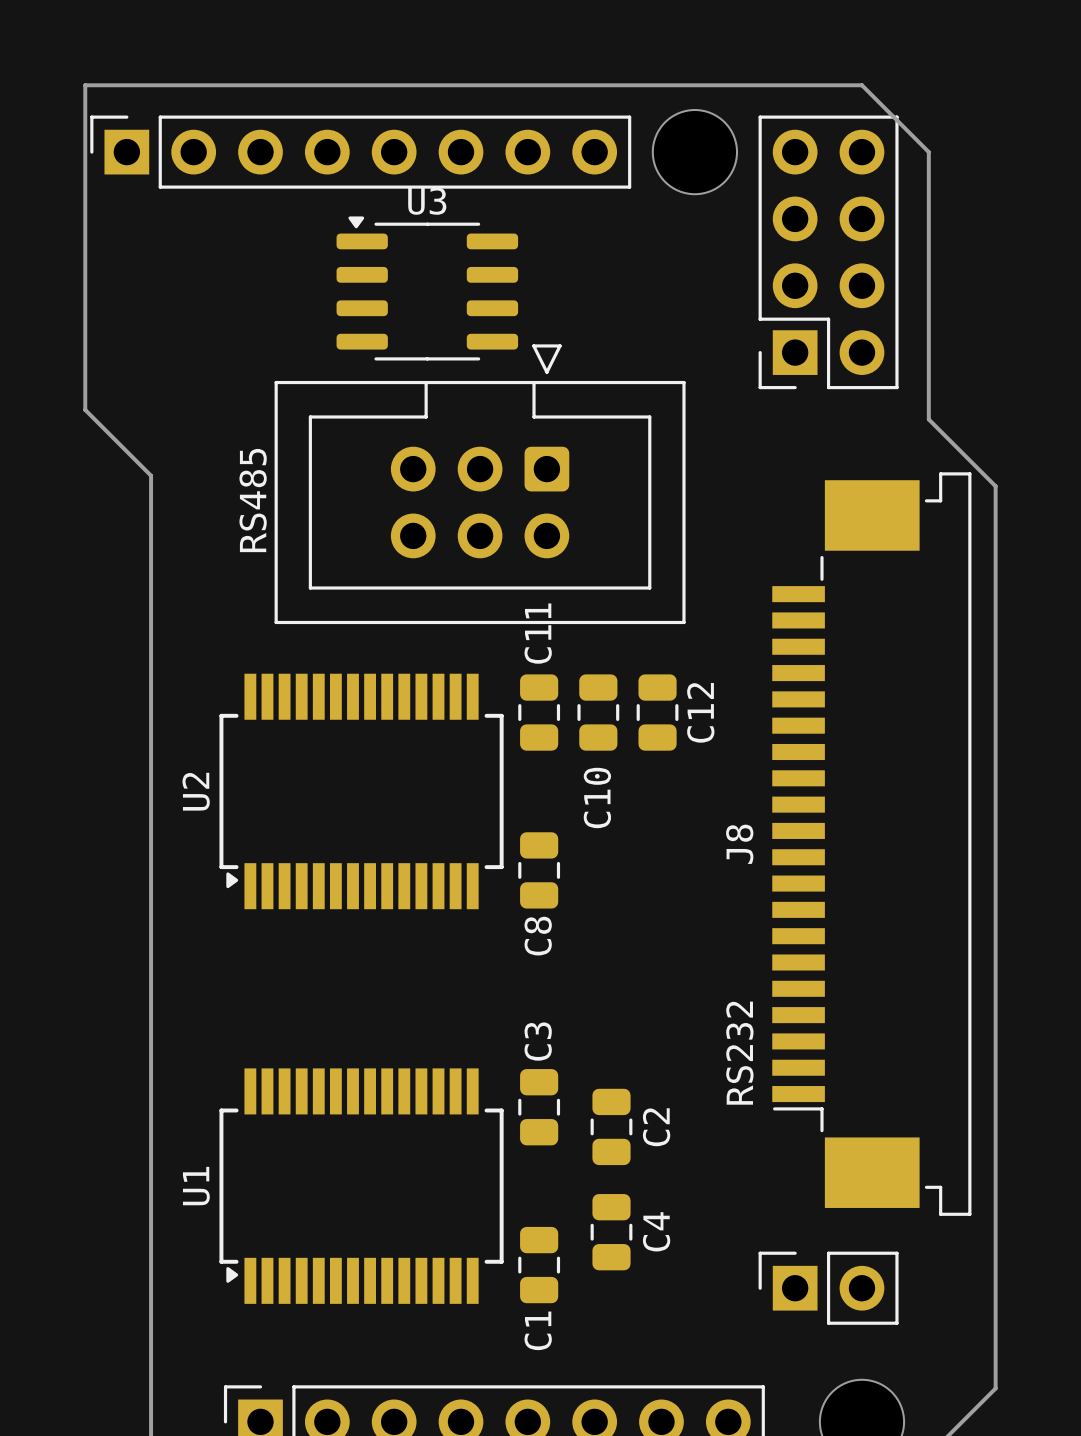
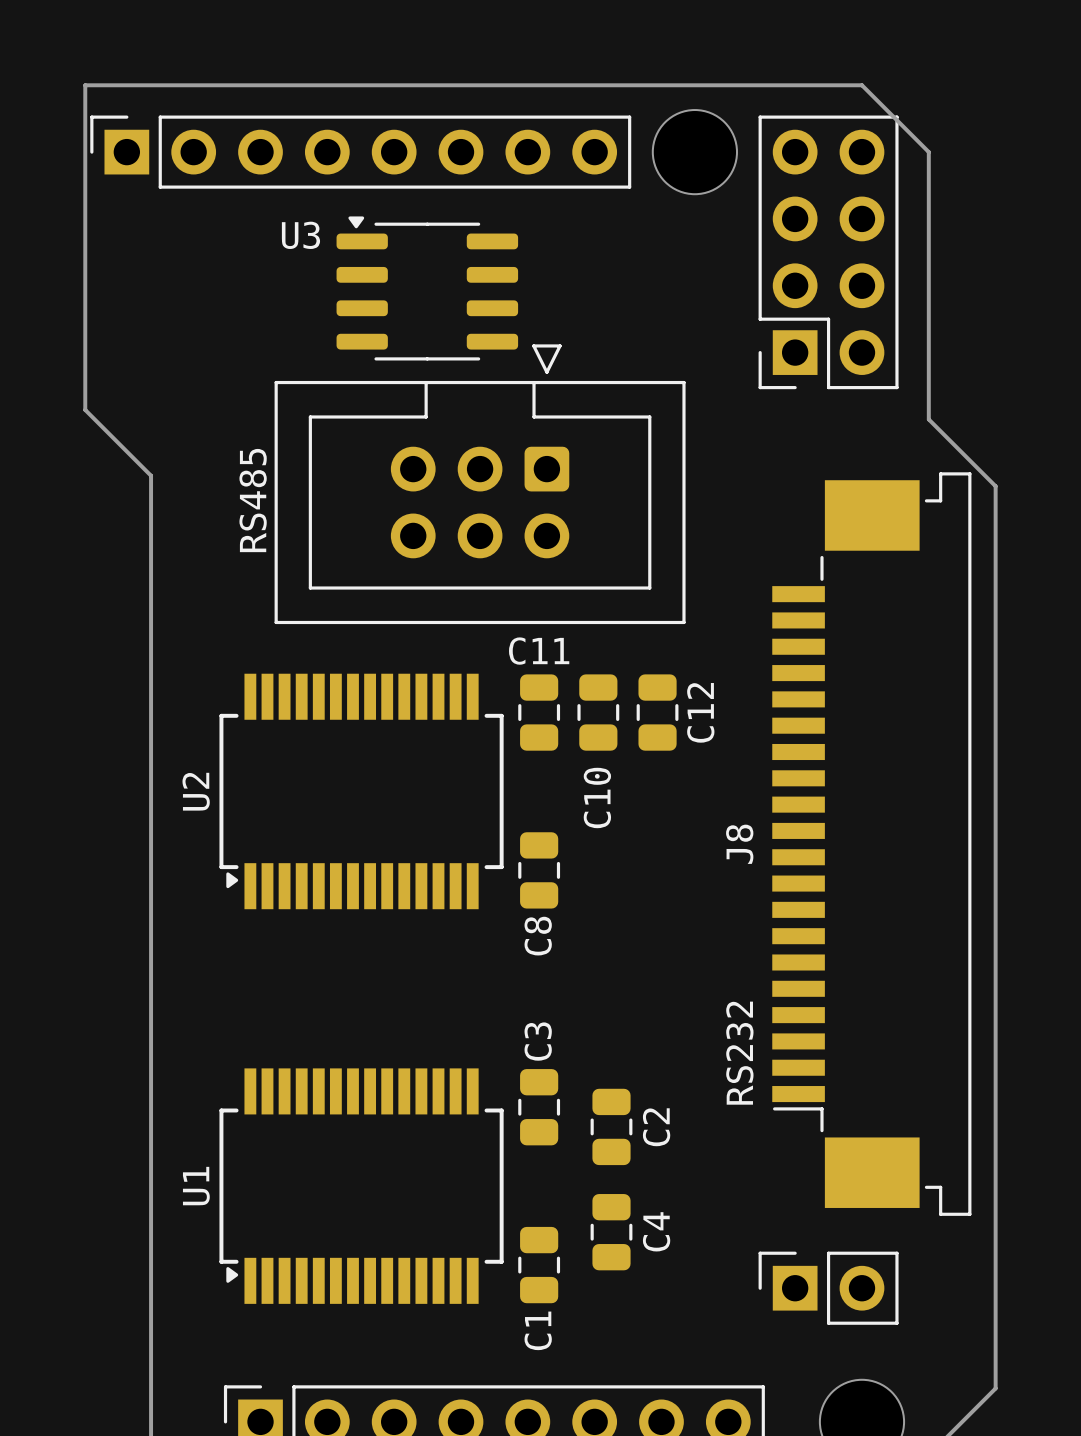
U3 name position: U3 (427, 201) -> U3 (300, 235)
C11 name rotation: 0° (538, 633) -> 90° clockwise (539, 651)

